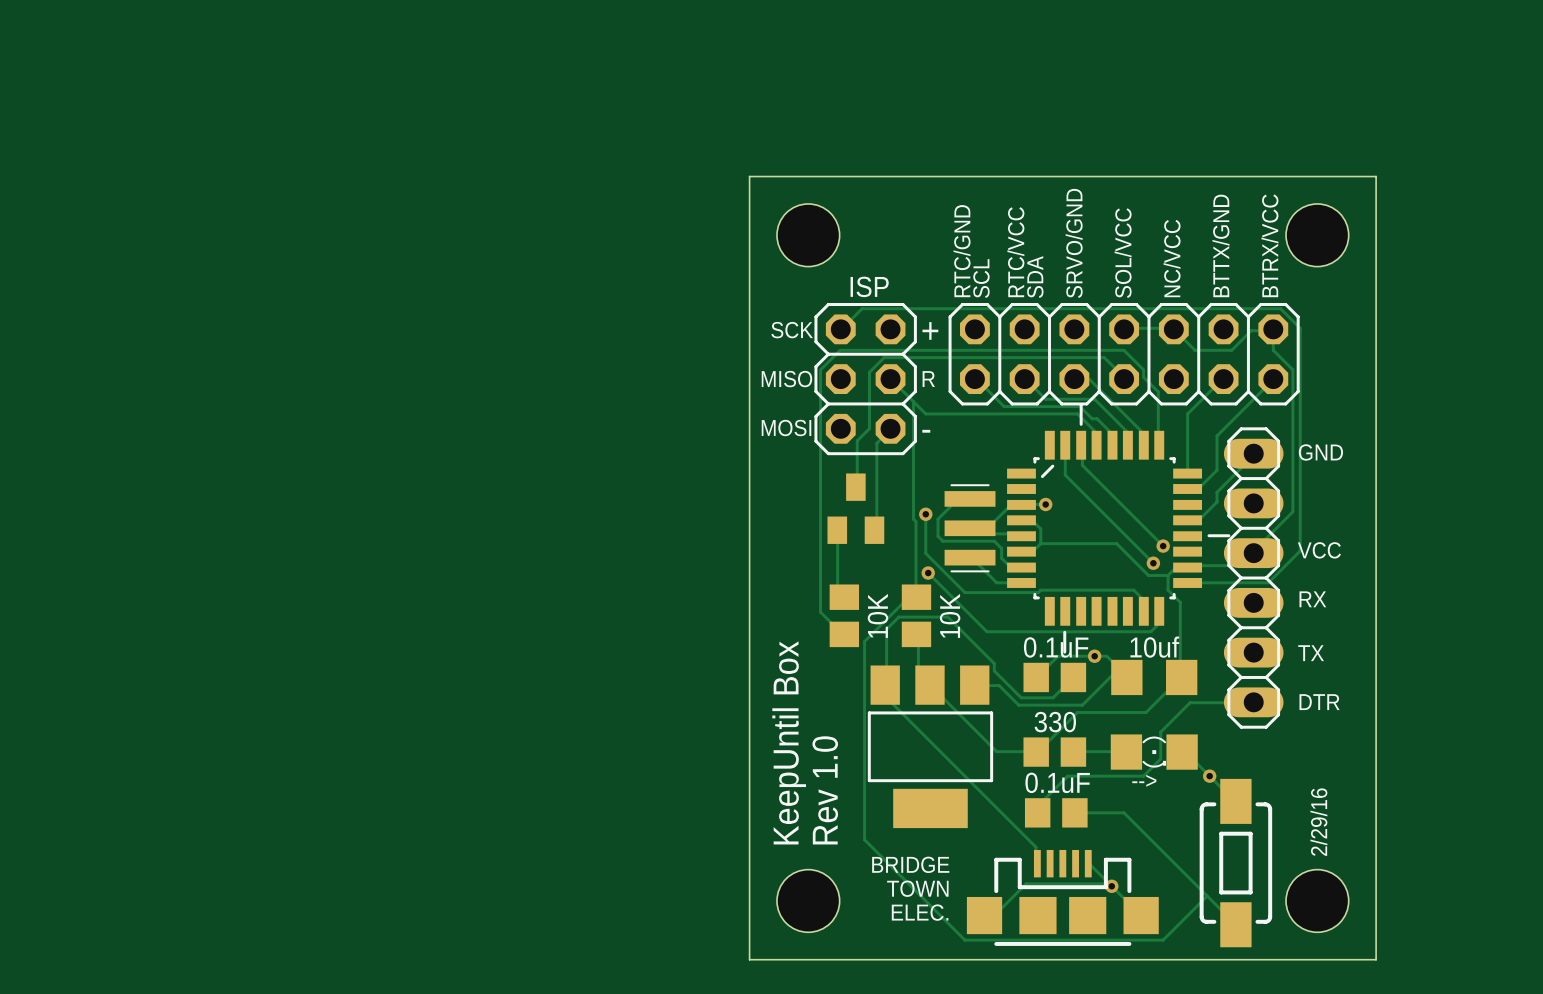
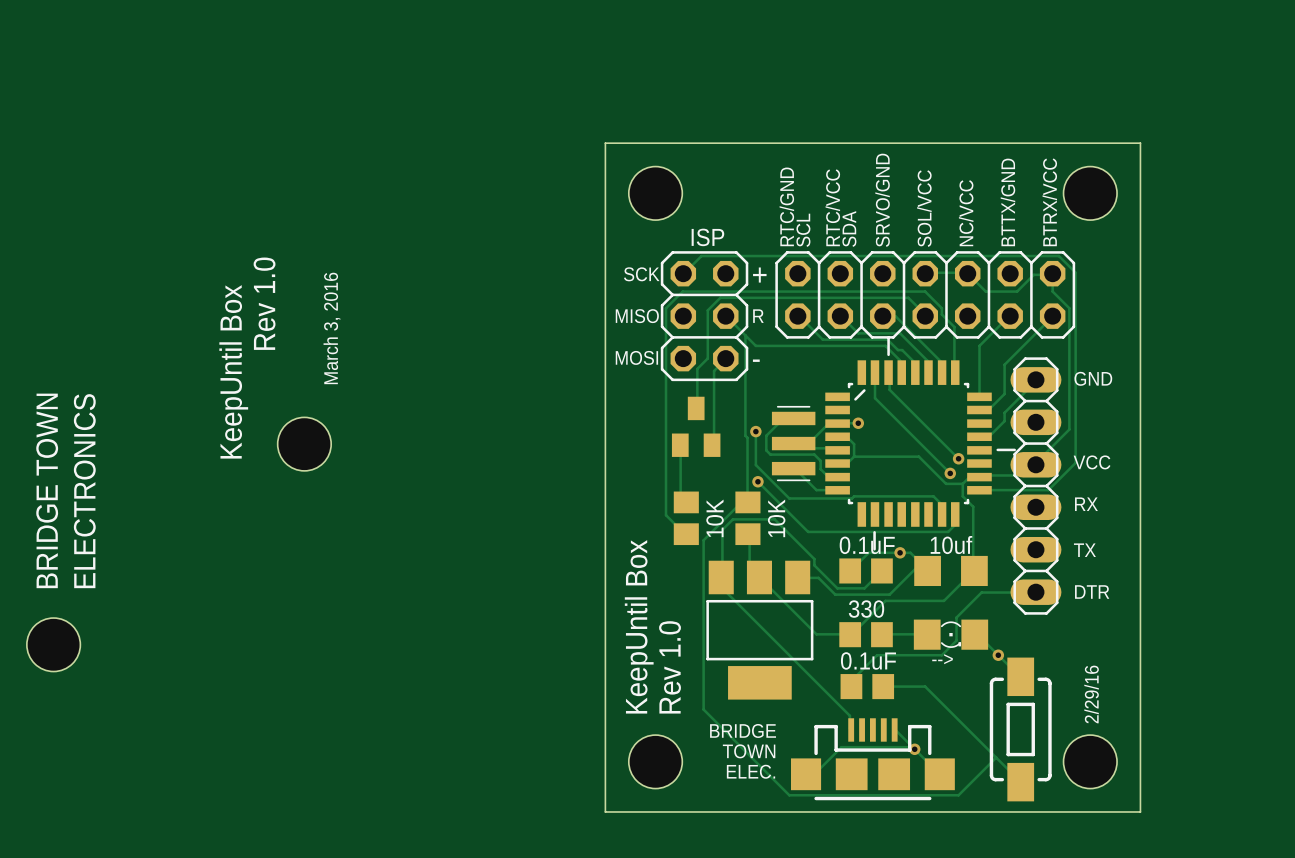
text: none -> Rev 1.0 (264, 303)
text: none -> March 3, 2016 (331, 328)
text: none -> KeepUntil Box (233, 371)
hole: none -> (304, 444)
text: none -> BRIDGE TOWN (47, 490)
text: none -> ELECTRONICS (84, 491)
hole: none -> (53, 644)

